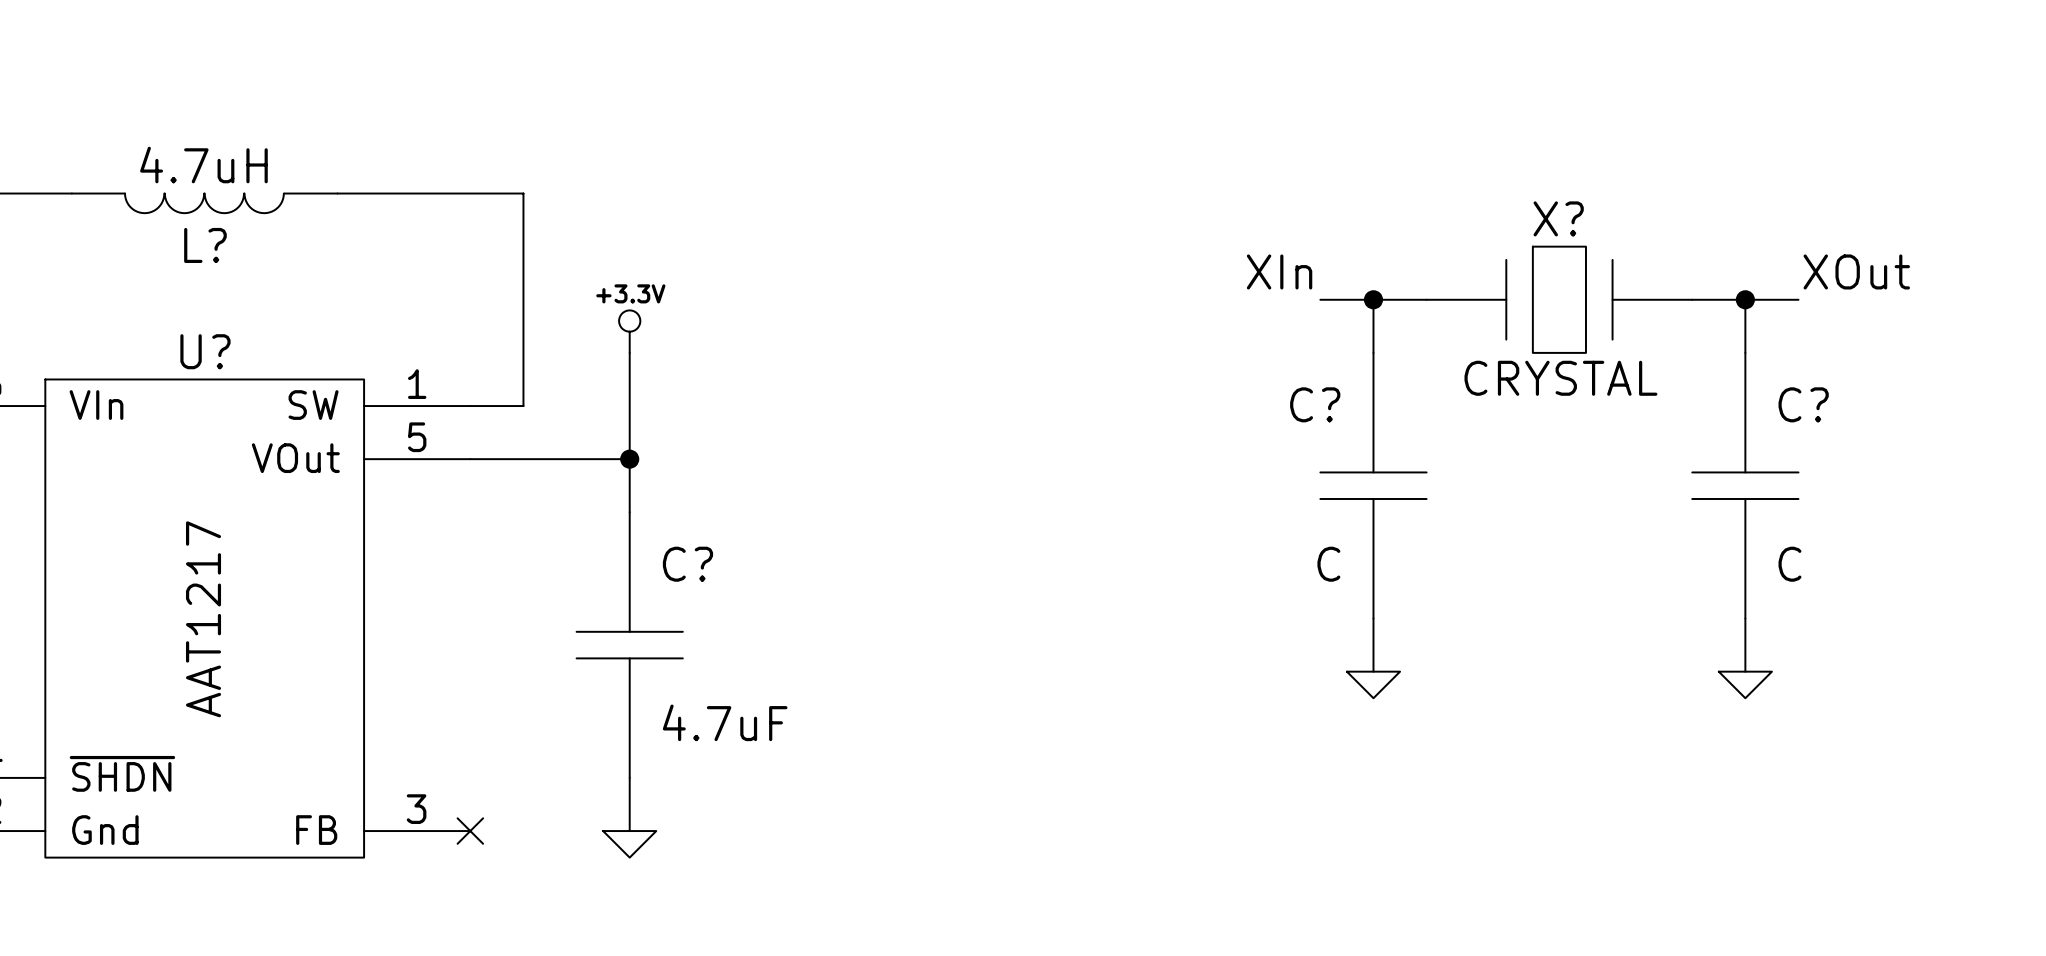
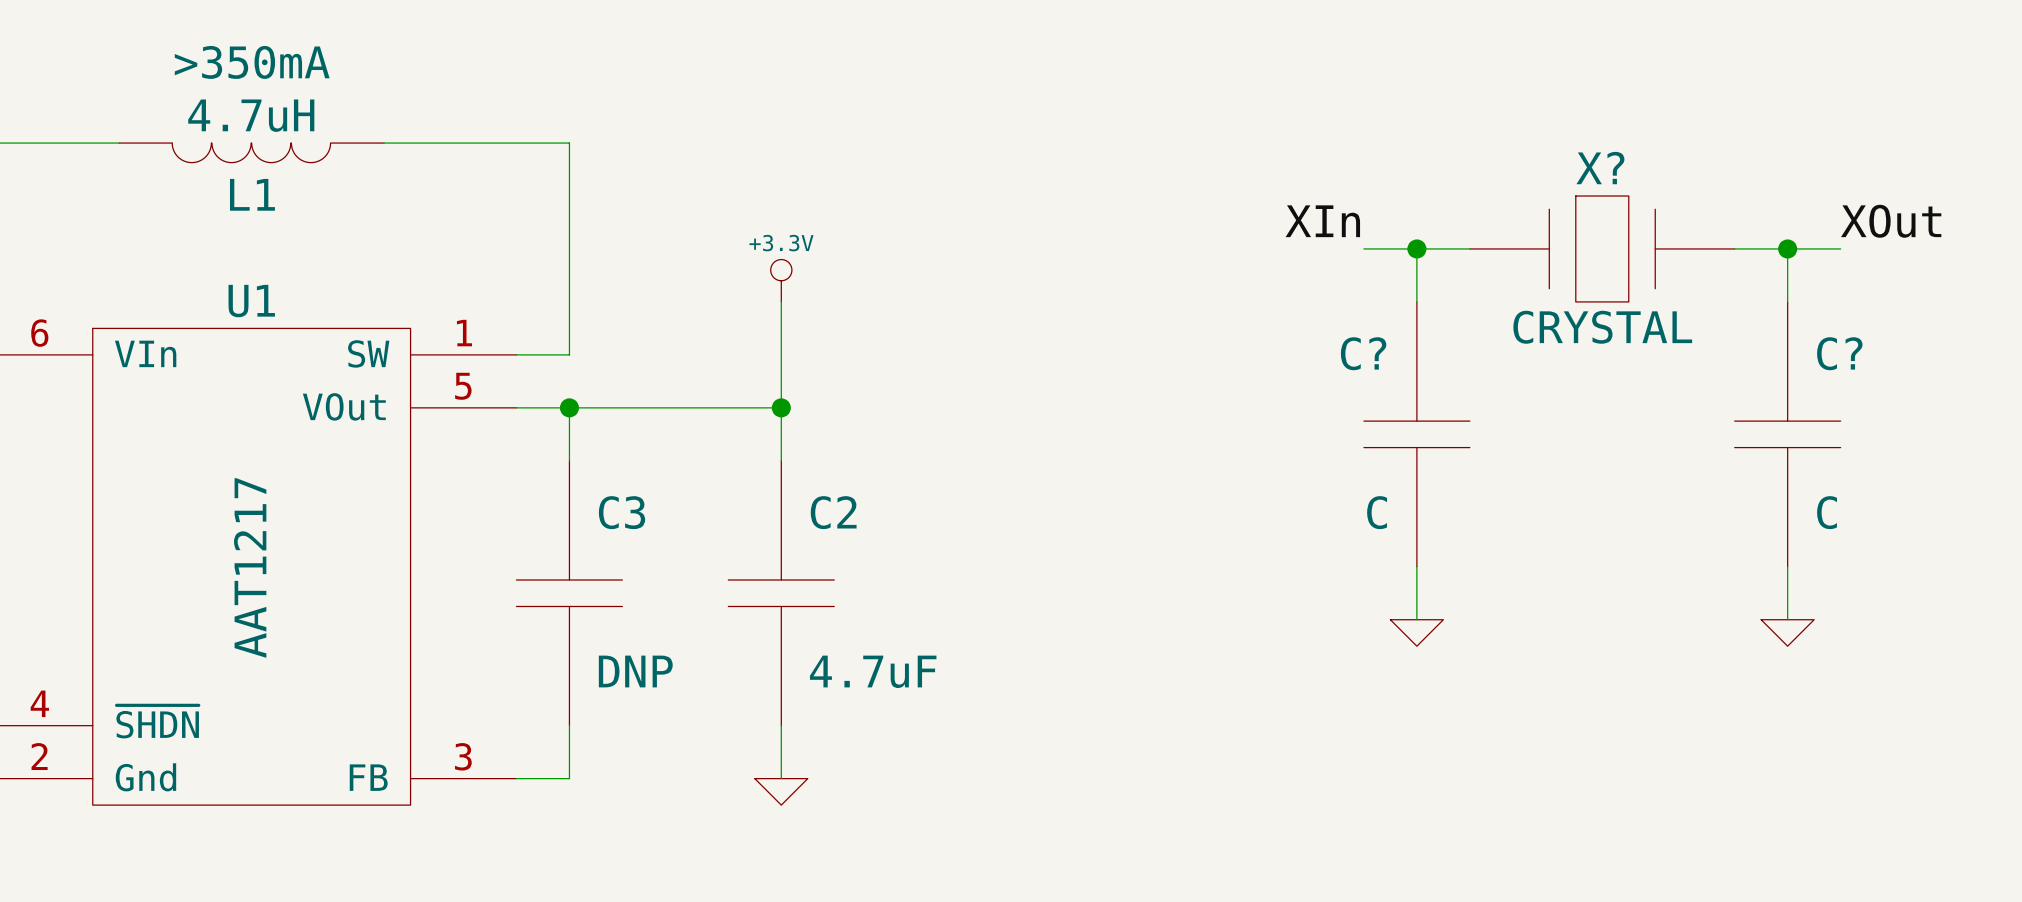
L? text: none -> >350mA (252, 62)
L? name: L? (205, 245) -> L1 (252, 194)
power symbol position: +3.3V (629, 331) -> +3.3V (781, 280)
U? name: U? (205, 351) -> U1 (251, 301)
wire: (629, 352) (629, 512) -> (781, 301) (781, 460)
wire: none -> (569, 407) (569, 460)
junction: none -> (569, 407)
wire: none -> (675, 407) (781, 407)
junction: (629, 459) -> none
junction: none -> (781, 407)
C3: none -> DNP (569, 593)
C?: 4.7uF (629, 645) -> none
C2: none -> 4.7uF (781, 593)
wire: none -> (569, 725) (569, 778) (516, 778)
wire: (629, 777) (629, 831) -> (781, 725) (781, 778)
no-connect mark: (470, 831) -> none
power symbol position: (629, 844) -> (781, 791)

